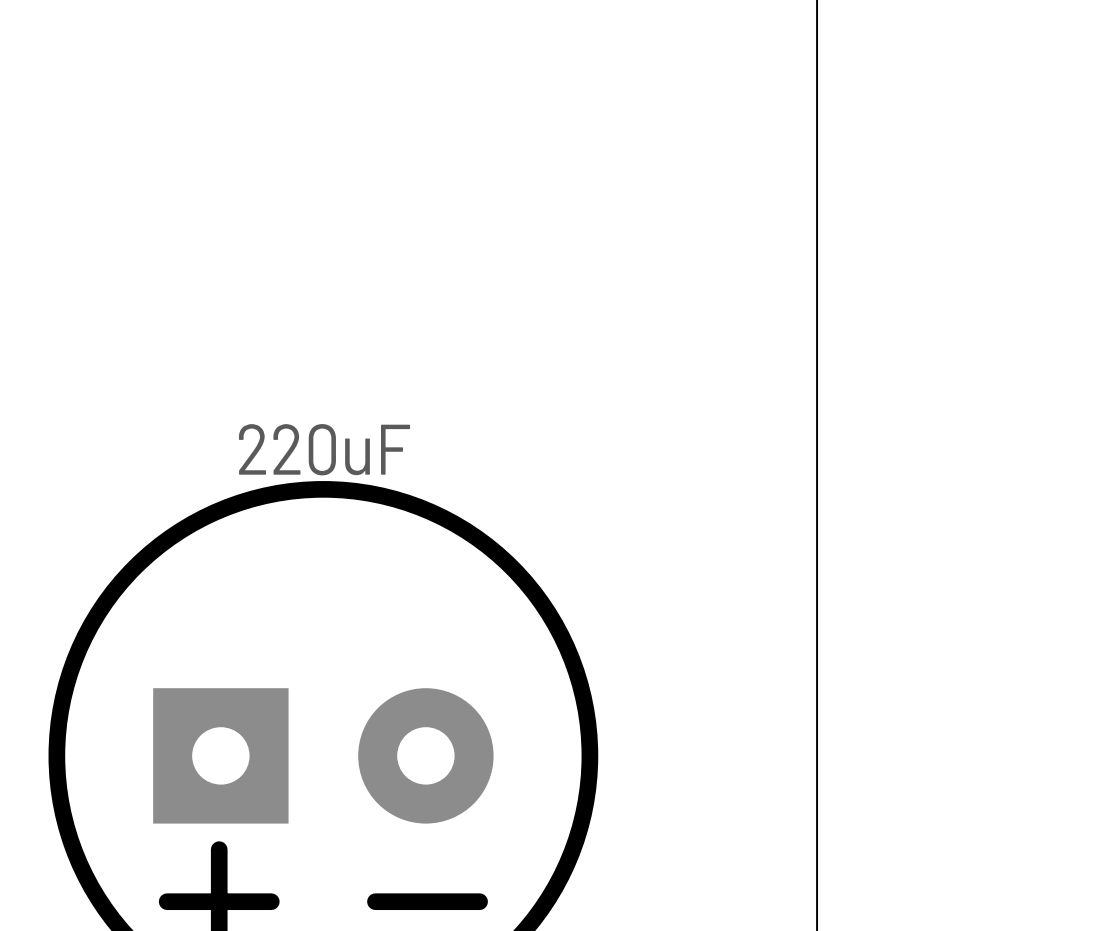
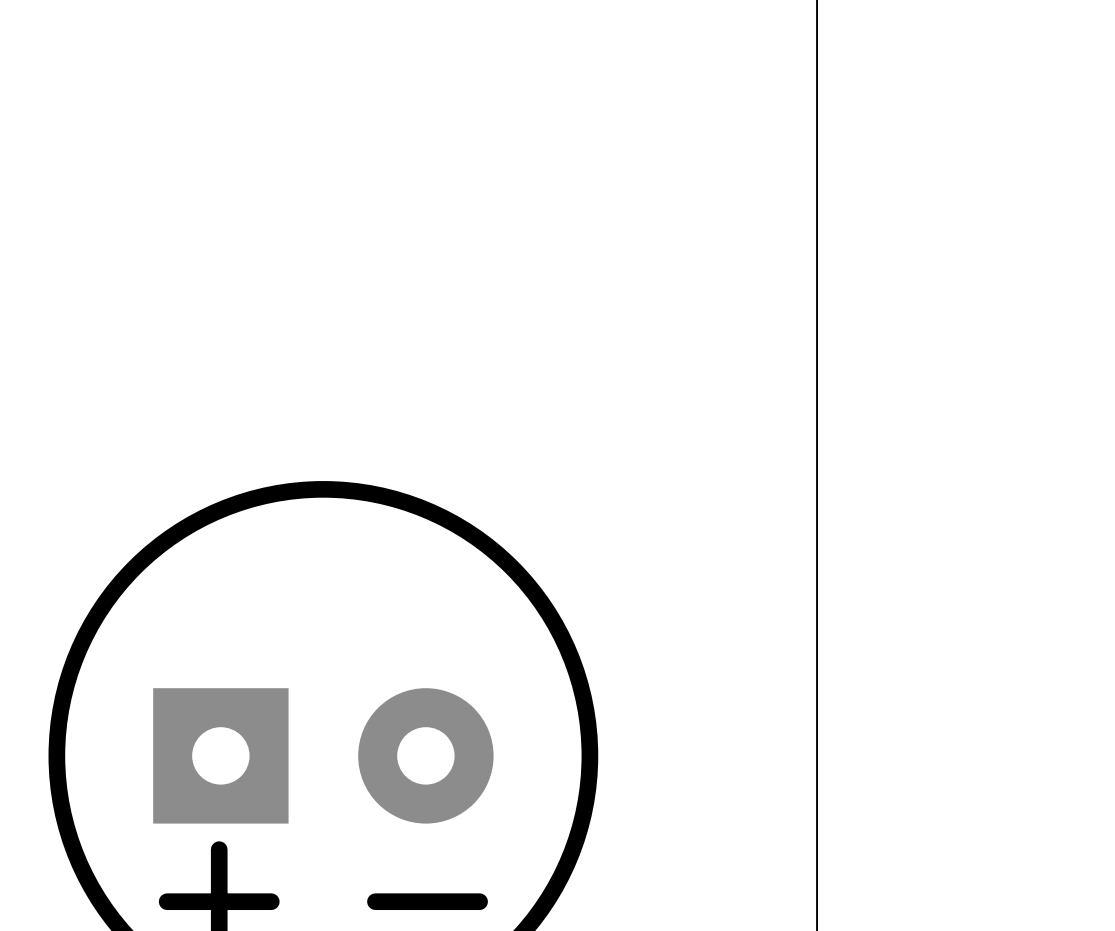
part value: 220uF (324, 449) -> none

